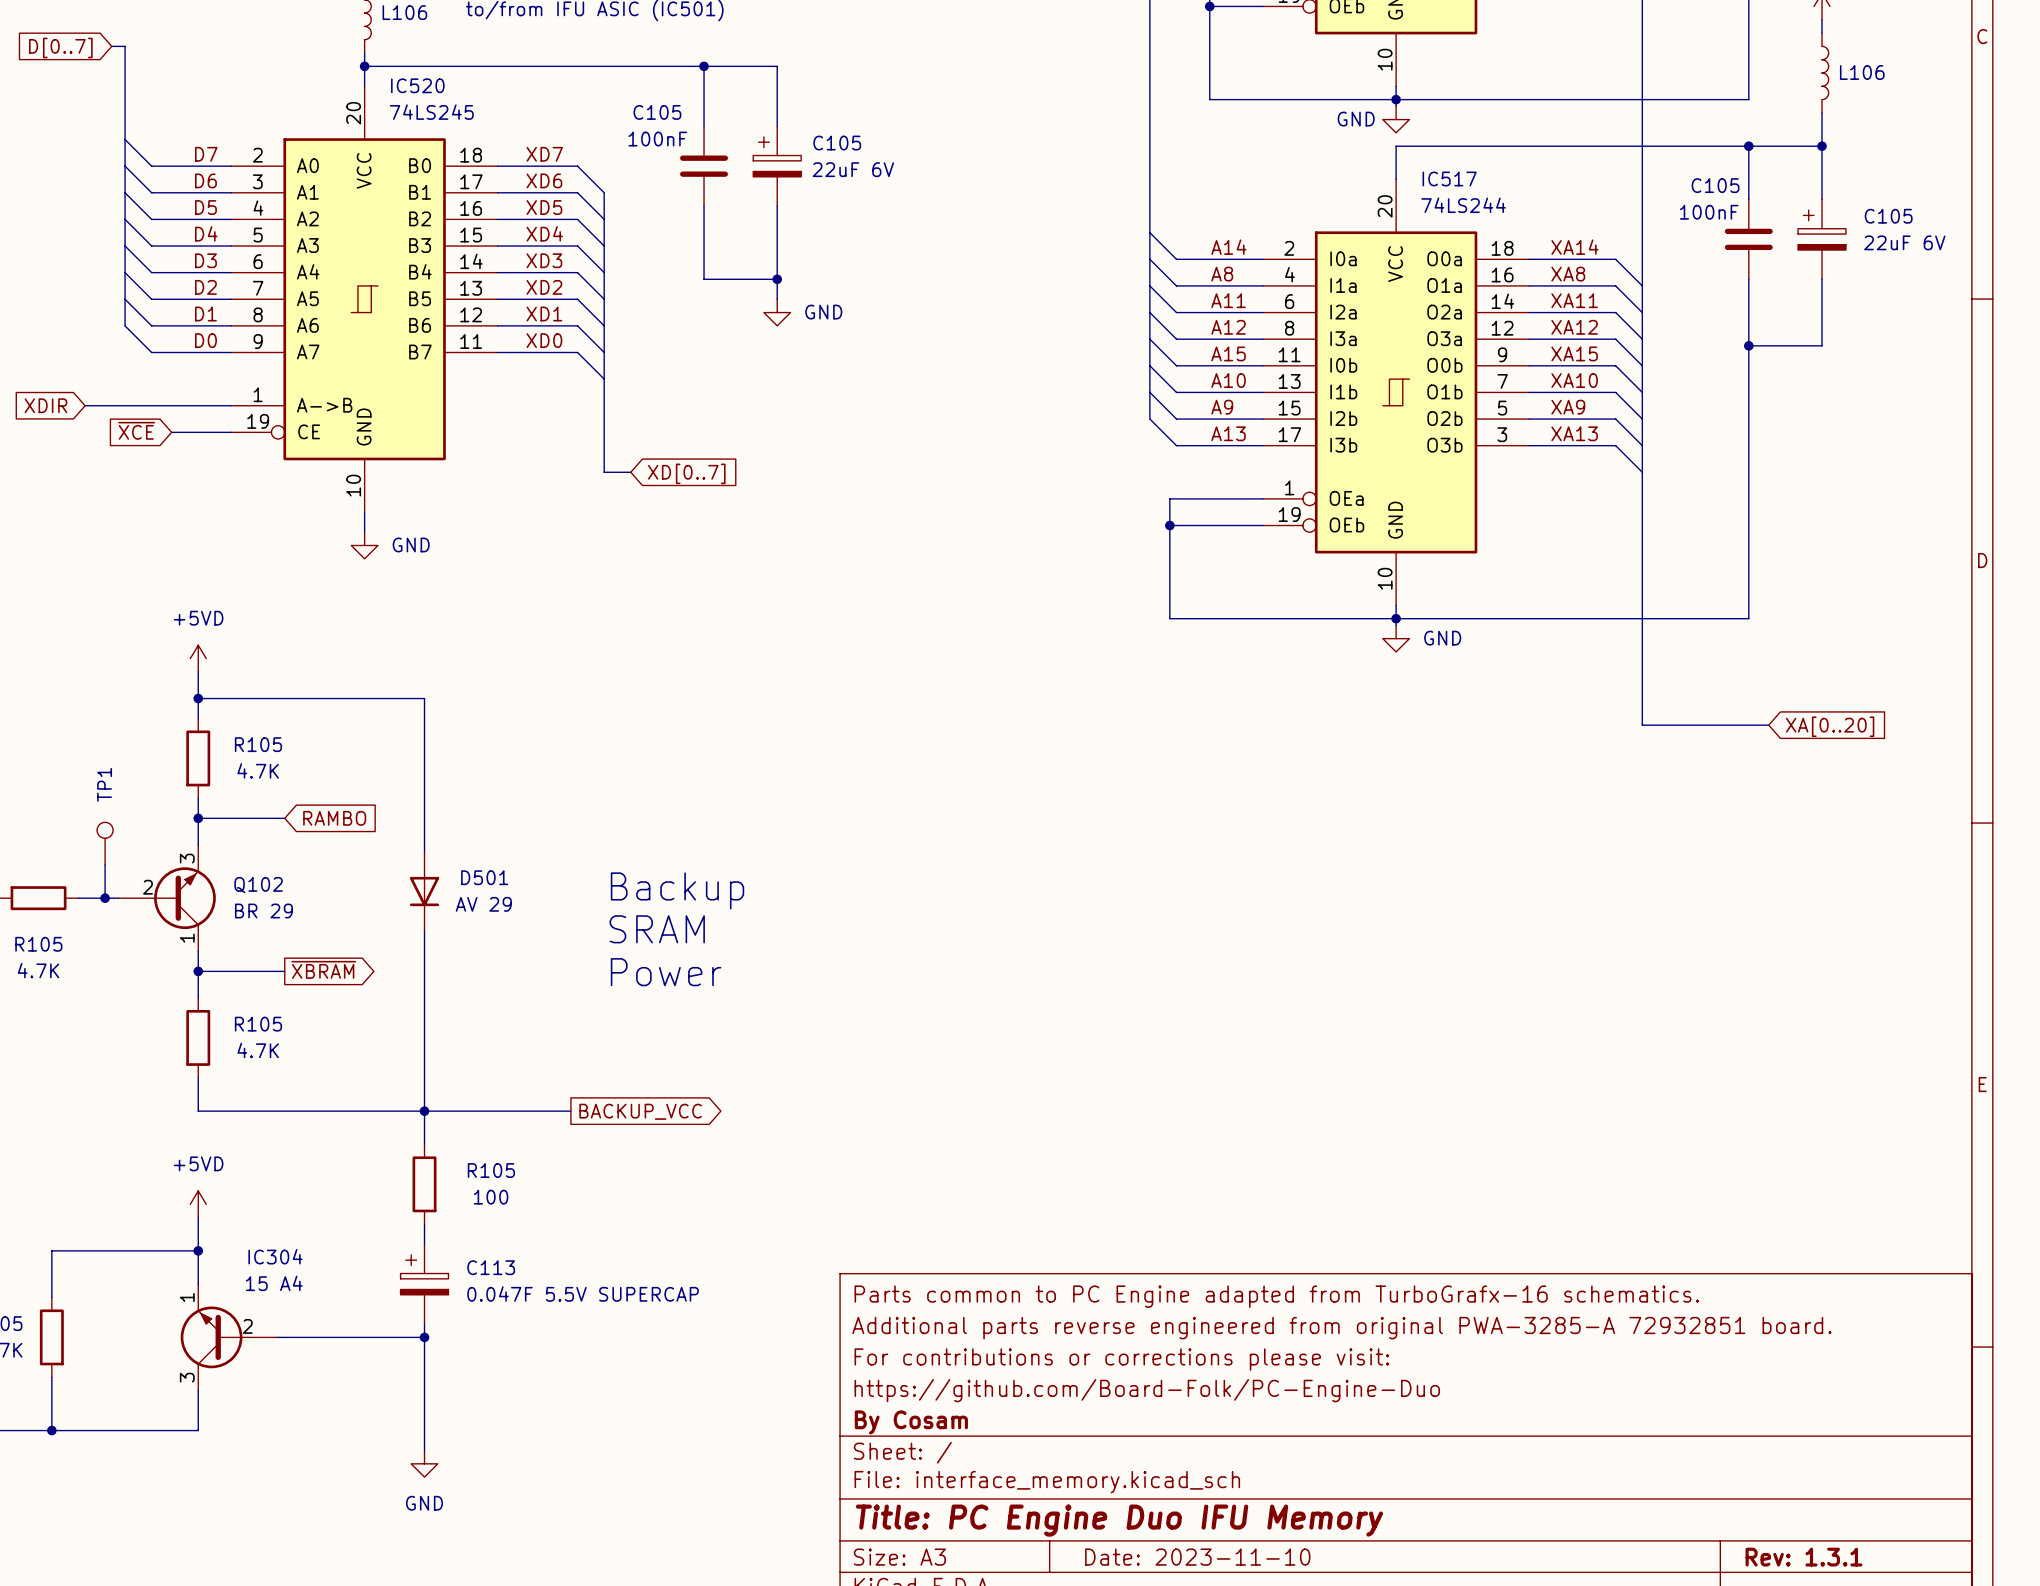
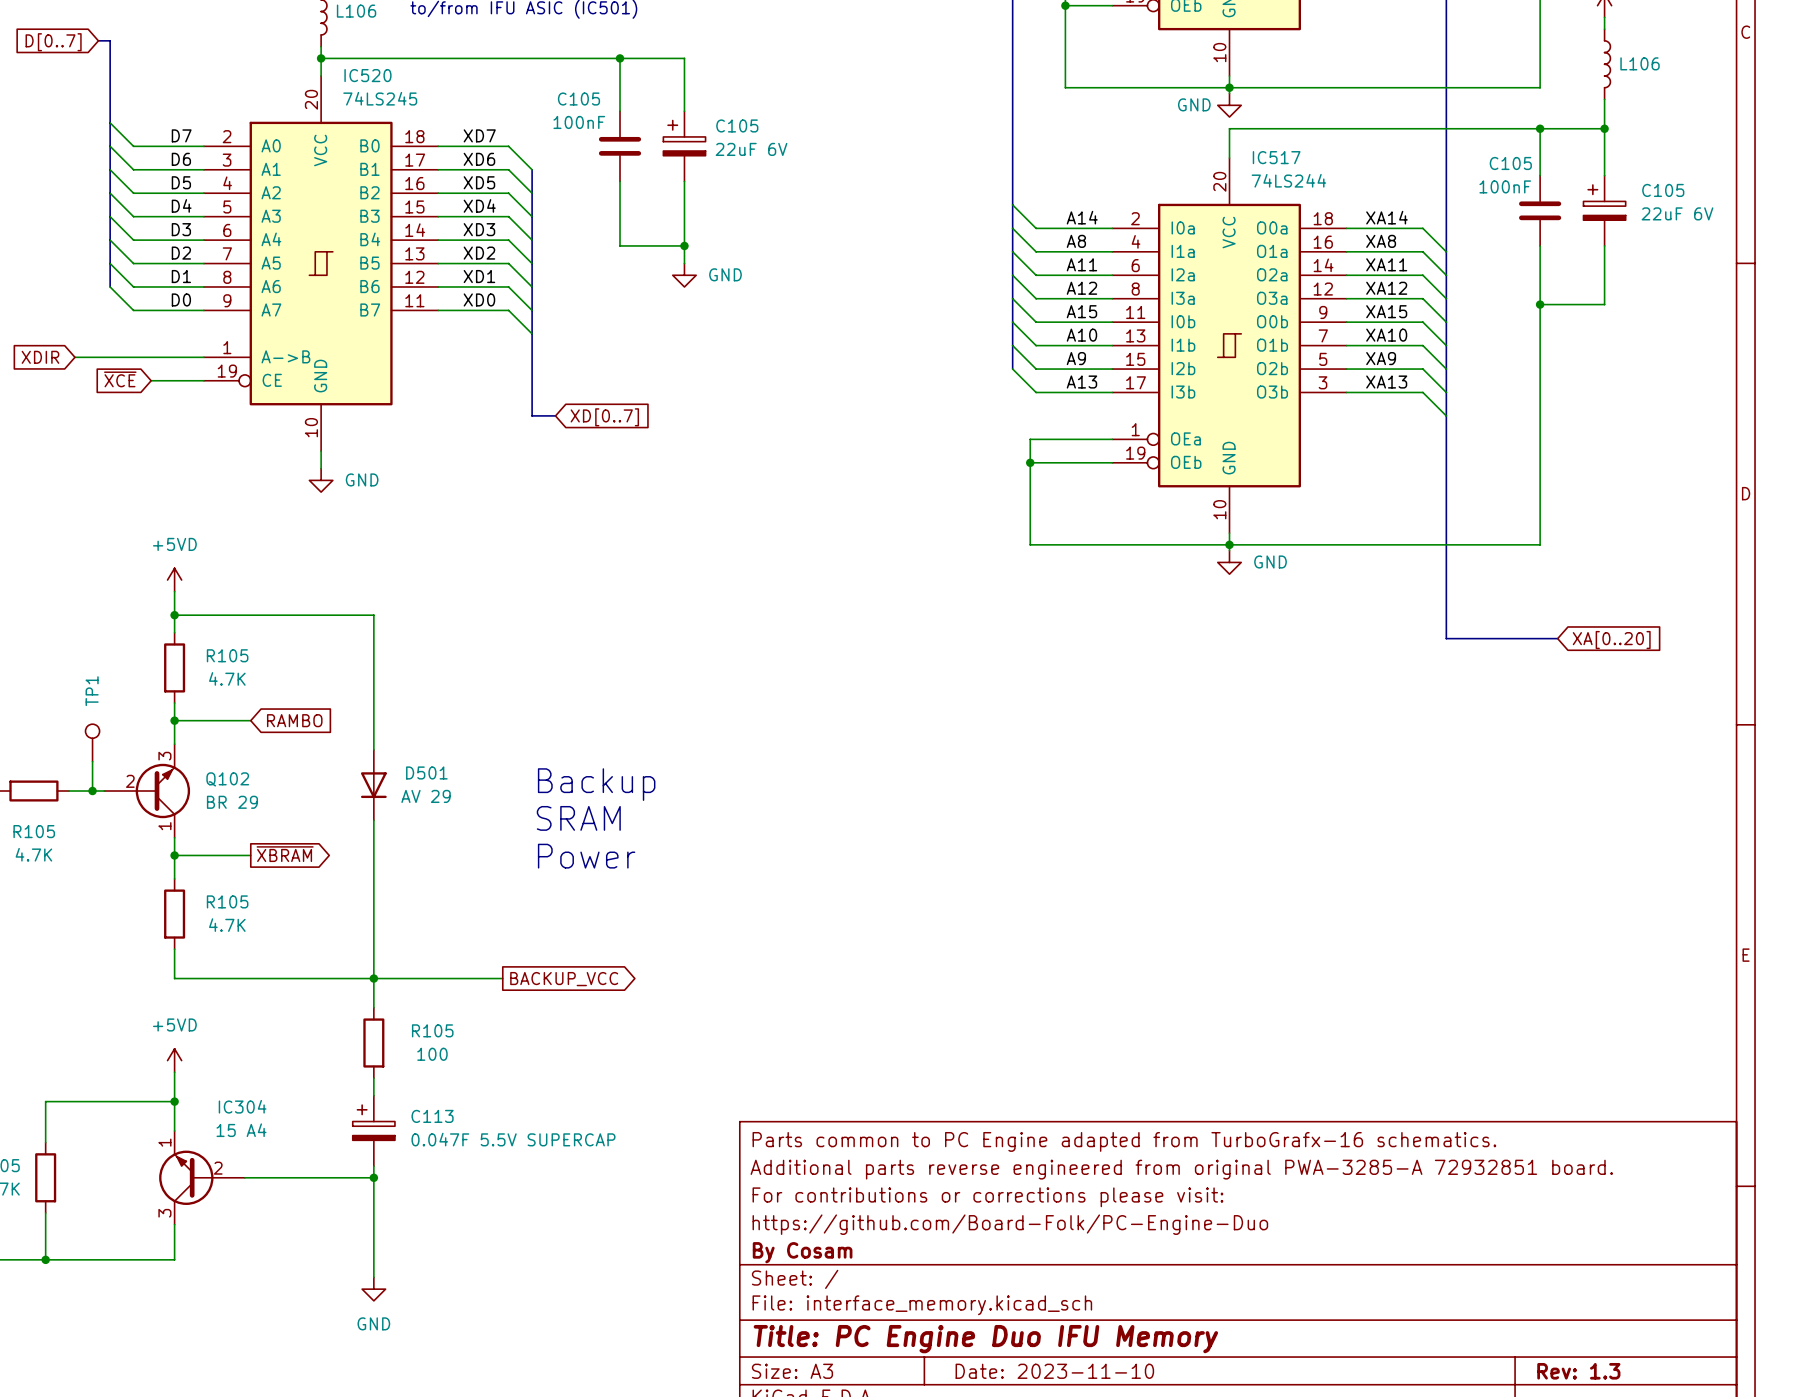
title block: Rev: 1.3.1 (1804, 1557) -> Rev: 1.3 (1578, 1371)

